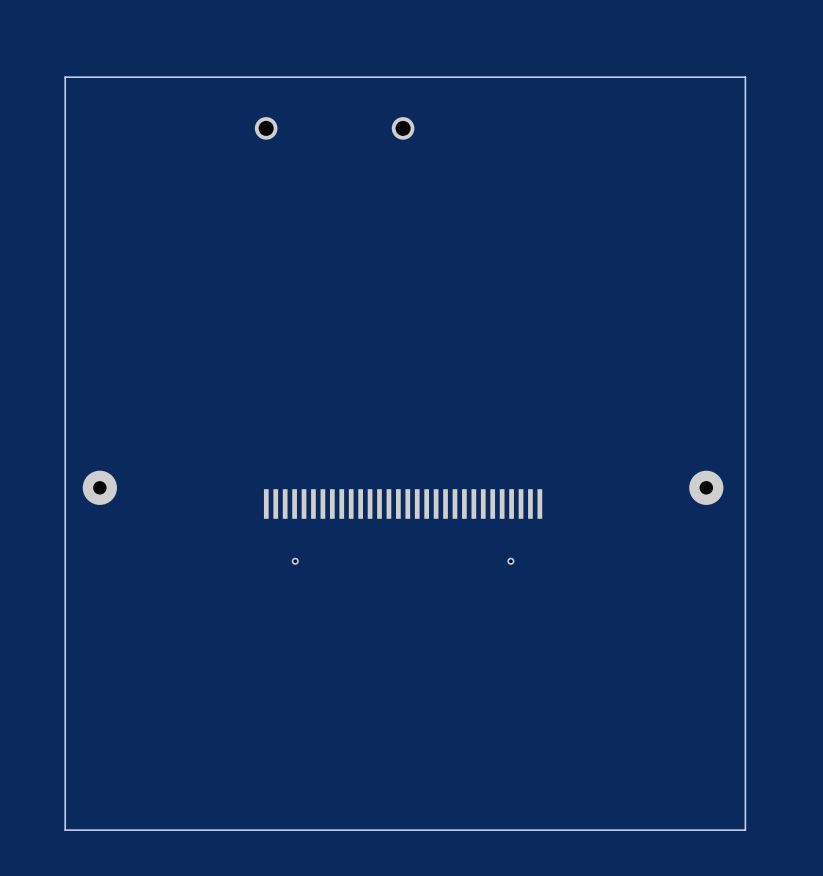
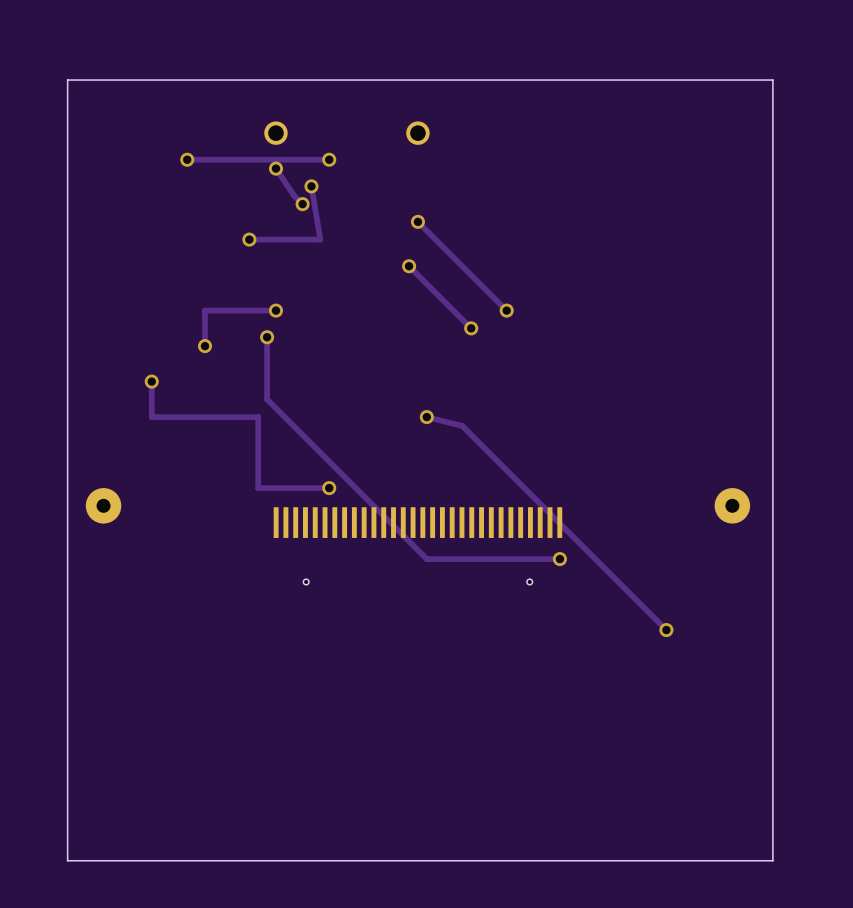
via: none -> (187, 159)
track: none -> (329, 159) (187, 159)
via: none -> (329, 159)
track: none -> (275, 168) (293, 195) (302, 204)
via: none -> (275, 168)
track: none -> (311, 186) (320, 239) (249, 239)
via: none -> (311, 186)
via: none -> (302, 204)
track: none -> (417, 221) (506, 310)
via: none -> (417, 221)
via: none -> (249, 239)
track: none -> (409, 266) (471, 328)
via: none -> (409, 266)
track: none -> (275, 310) (204, 310) (204, 346)
via: none -> (275, 310)
via: none -> (506, 310)
via: none -> (471, 328)
track: none -> (267, 337) (267, 399) (426, 559) (559, 559)
via: none -> (267, 337)
via: none -> (204, 346)
track: none -> (151, 381) (151, 417) (258, 417) (258, 488) (329, 488)
via: none -> (151, 381)
track: none -> (426, 417) (462, 425) (666, 630)
via: none -> (426, 417)
via: none -> (329, 488)
via: none -> (559, 559)
via: none -> (666, 630)

